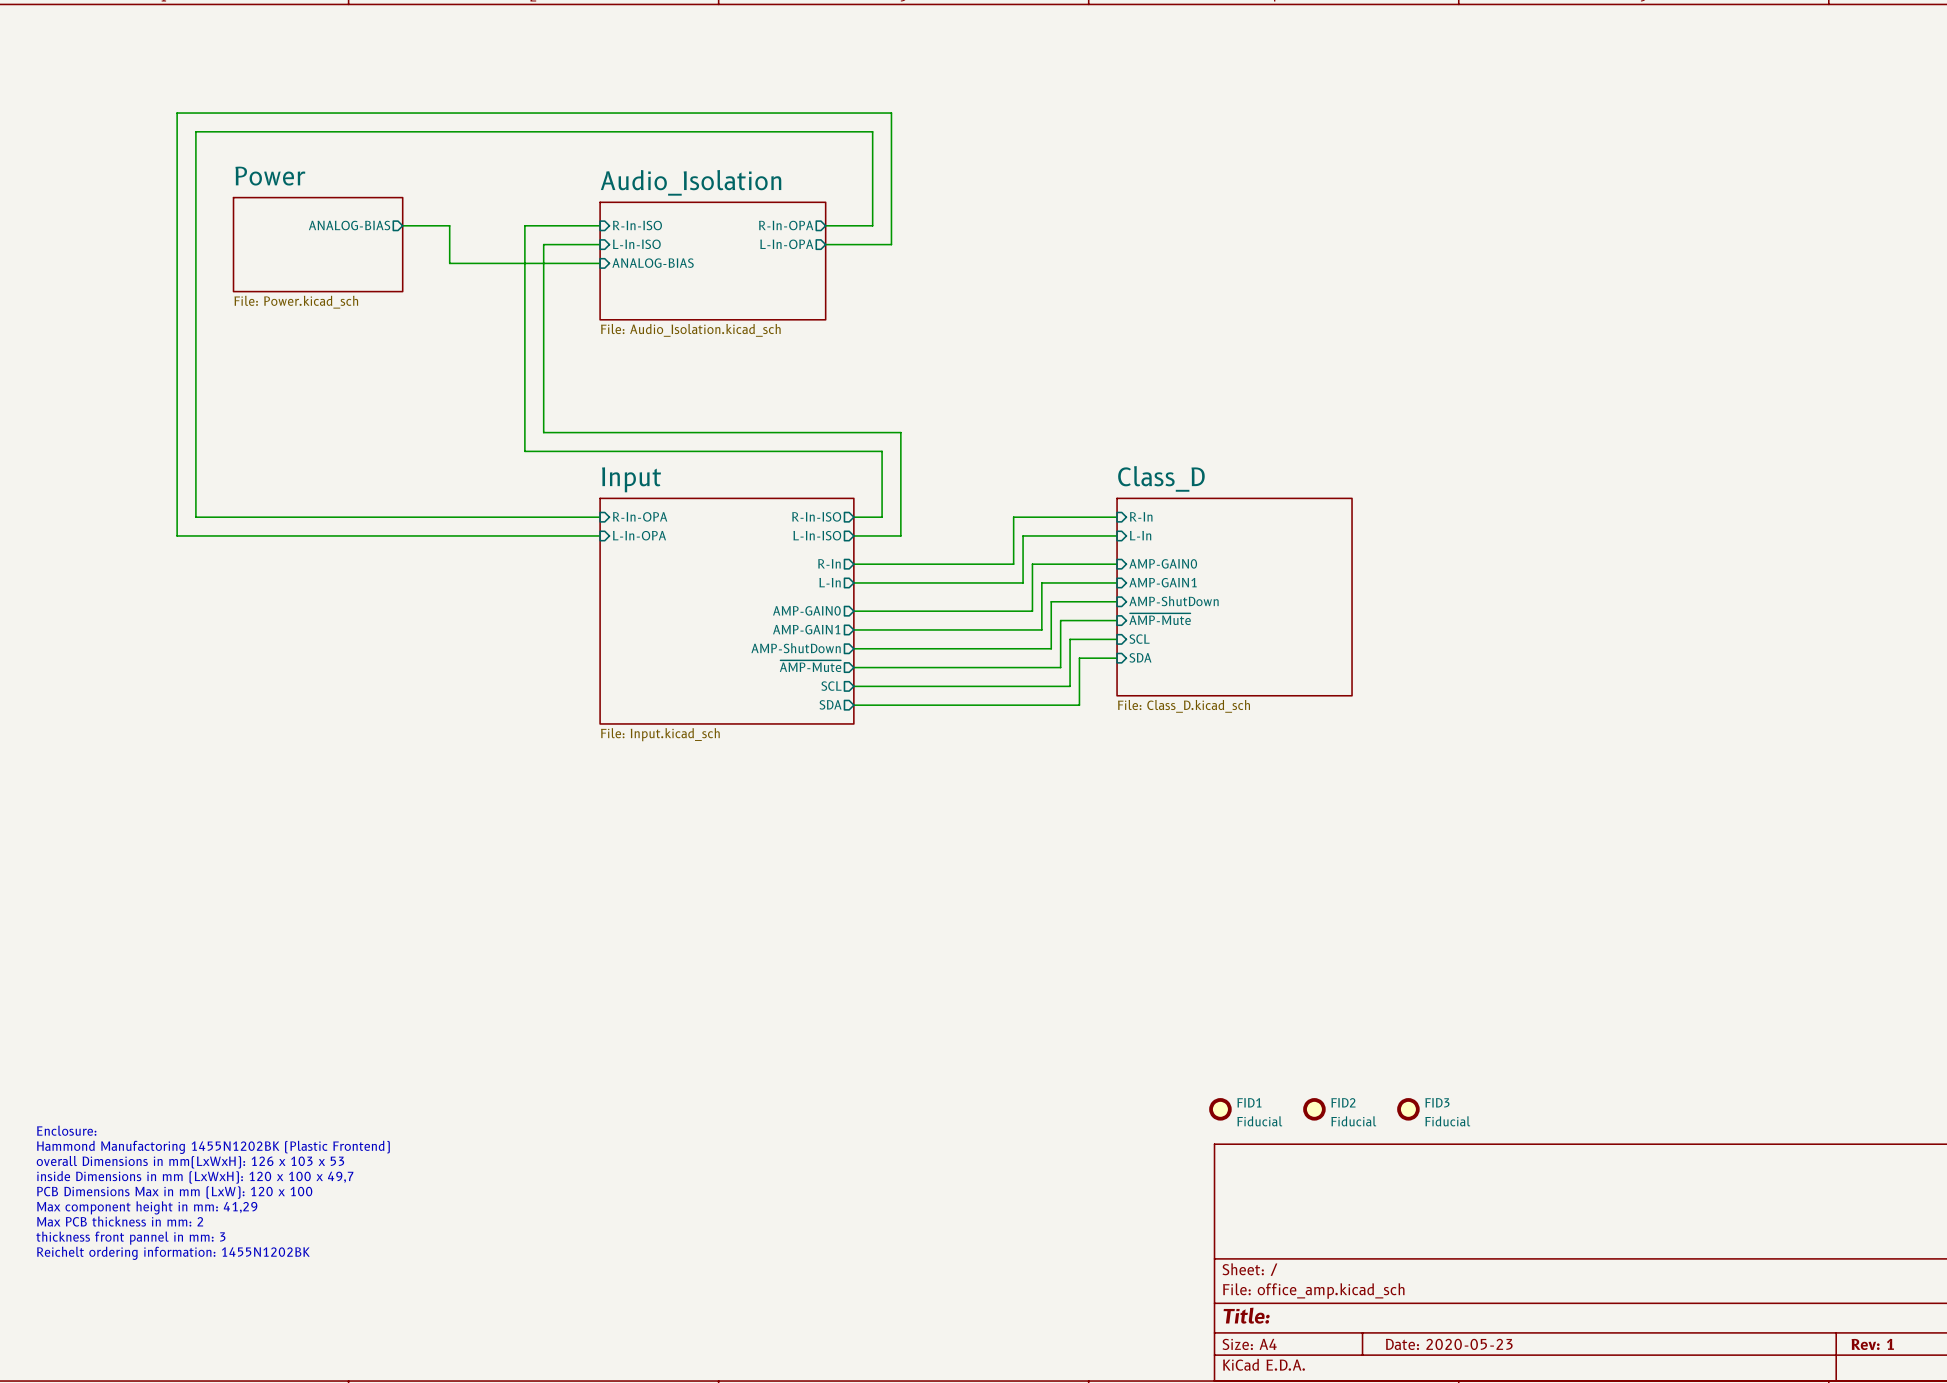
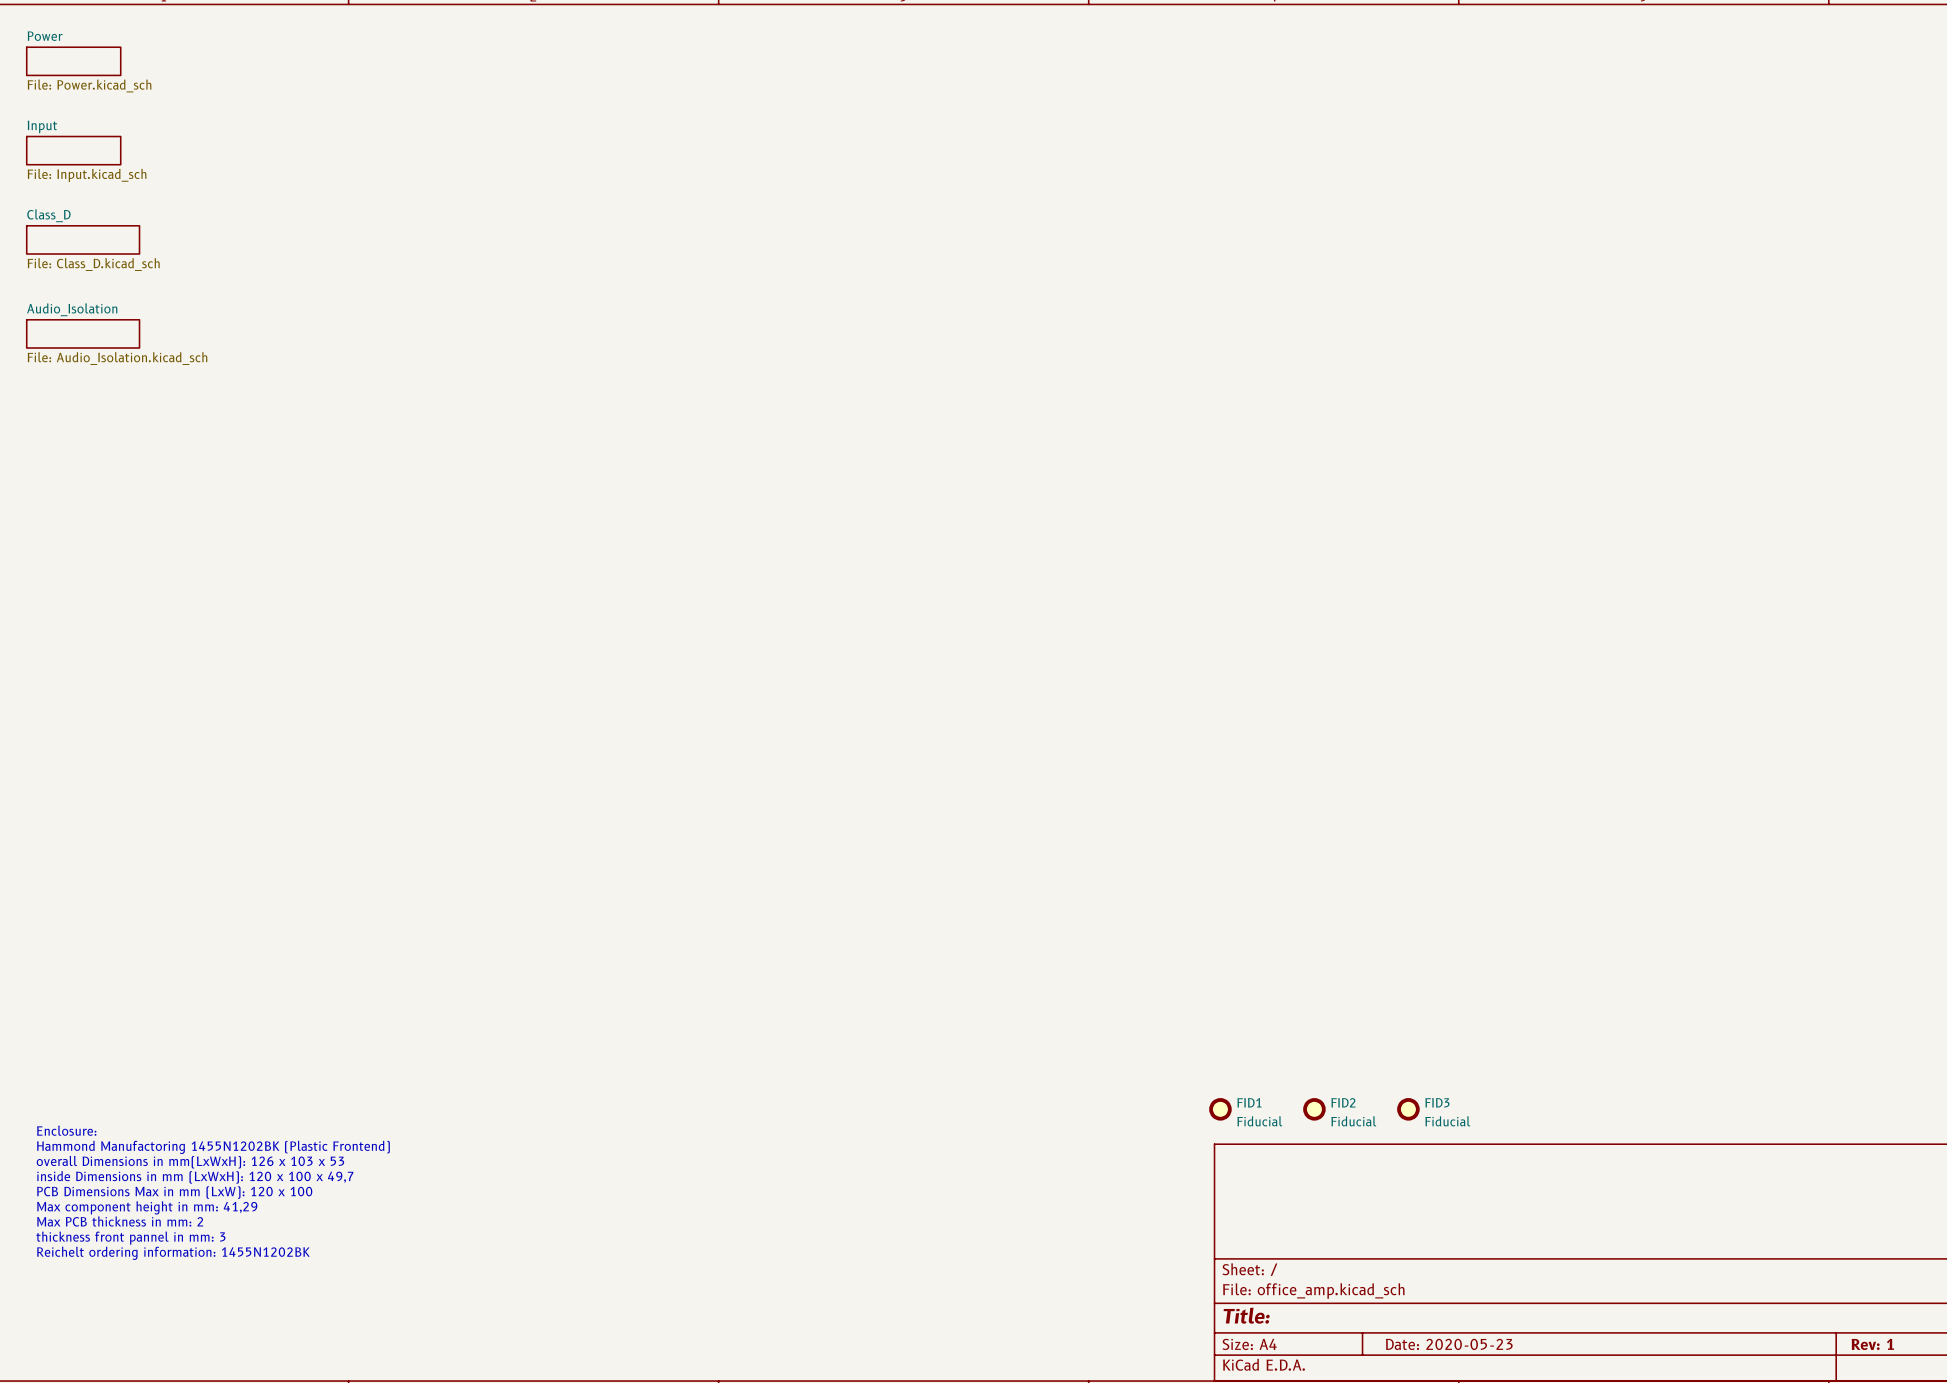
sheet Power: none -> File: Power.kicad_sch (73, 61)
sheet Input: none -> File: Input.kicad_sch (73, 150)
sheet pin: ANALOG-BIAS (349, 225) -> none
wire: (402, 225) (449, 225) (449, 263) (600, 263) -> none
wire: (600, 225) (524, 225) (524, 451) (882, 451) (882, 517) (853, 517) -> none
sheet pin: R-In-ISO (637, 225) -> none
sheet pin: R-In-OPA (786, 225) -> none
wire: (825, 225) (872, 225) (872, 131) (195, 131) (195, 517) (600, 517) -> none
sheet Class_D: none -> File: Class_D.kicad_sch (83, 239)
sheet Power: File: Power.kicad_sch (318, 244) -> none
wire: (600, 244) (543, 244) (543, 432) (900, 432) (900, 535) (853, 535) -> none
sheet pin: L-In-ISO (636, 244) -> none
sheet pin: L-In-OPA (786, 244) -> none
wire: (825, 244) (891, 244) (891, 113) (177, 113) (177, 535) (600, 535) -> none
sheet Audio_Isolation: File: Audio_Isolation.kicad_sch (712, 261) -> none
sheet pin: ANALOG-BIAS (653, 263) -> none
sheet Audio_Isolation: none -> File: Audio_Isolation.kicad_sch (83, 333)
sheet pin: R-In-OPA (640, 516) -> none
sheet pin: R-In-ISO (816, 516) -> none
sheet pin: R-In (1141, 516) -> none
wire: (1117, 517) (1013, 517) (1013, 564) (853, 564) -> none
sheet pin: L-In-OPA (639, 535) -> none
sheet pin: L-In-ISO (817, 535) -> none
wire: (1117, 535) (1023, 535) (1023, 582) (853, 582) -> none
sheet pin: L-In (1140, 535) -> none
sheet pin: R-In (829, 563) -> none
sheet pin: AMP-GAIN0 (1163, 563) -> none
wire: (1117, 564) (1032, 564) (1032, 611) (853, 611) -> none
sheet pin: L-In (830, 582) -> none
wire: (1117, 582) (1041, 582) (1041, 629) (853, 629) -> none
sheet pin: AMP-GAIN1 (1163, 582) -> none
sheet Class_D: File: Class_D.kicad_sch (1234, 597) -> none
wire: (1117, 601) (1051, 601) (1051, 648) (853, 648) -> none
sheet pin: AMP-ShutDown (1174, 601) -> none
sheet pin: AMP-GAIN0 (806, 610) -> none
sheet Input: File: Input.kicad_sch (726, 611) -> none
sheet pin: ~{AMP-Mute} (1160, 619) -> none
wire: (1117, 620) (1060, 620) (1060, 667) (853, 667) -> none
sheet pin: AMP-GAIN1 (806, 629) -> none
wire: (1117, 639) (1070, 639) (1070, 686) (853, 686) -> none
sheet pin: SCL (1139, 639) -> none
sheet pin: AMP-ShutDown (796, 648) -> none
sheet pin: SDA (1140, 657) -> none
wire: (1117, 658) (1079, 658) (1079, 705) (853, 705) -> none
sheet pin: ~{AMP-Mute} (810, 666) -> none
sheet pin: SCL (831, 686) -> none
sheet pin: SDA (830, 704) -> none

